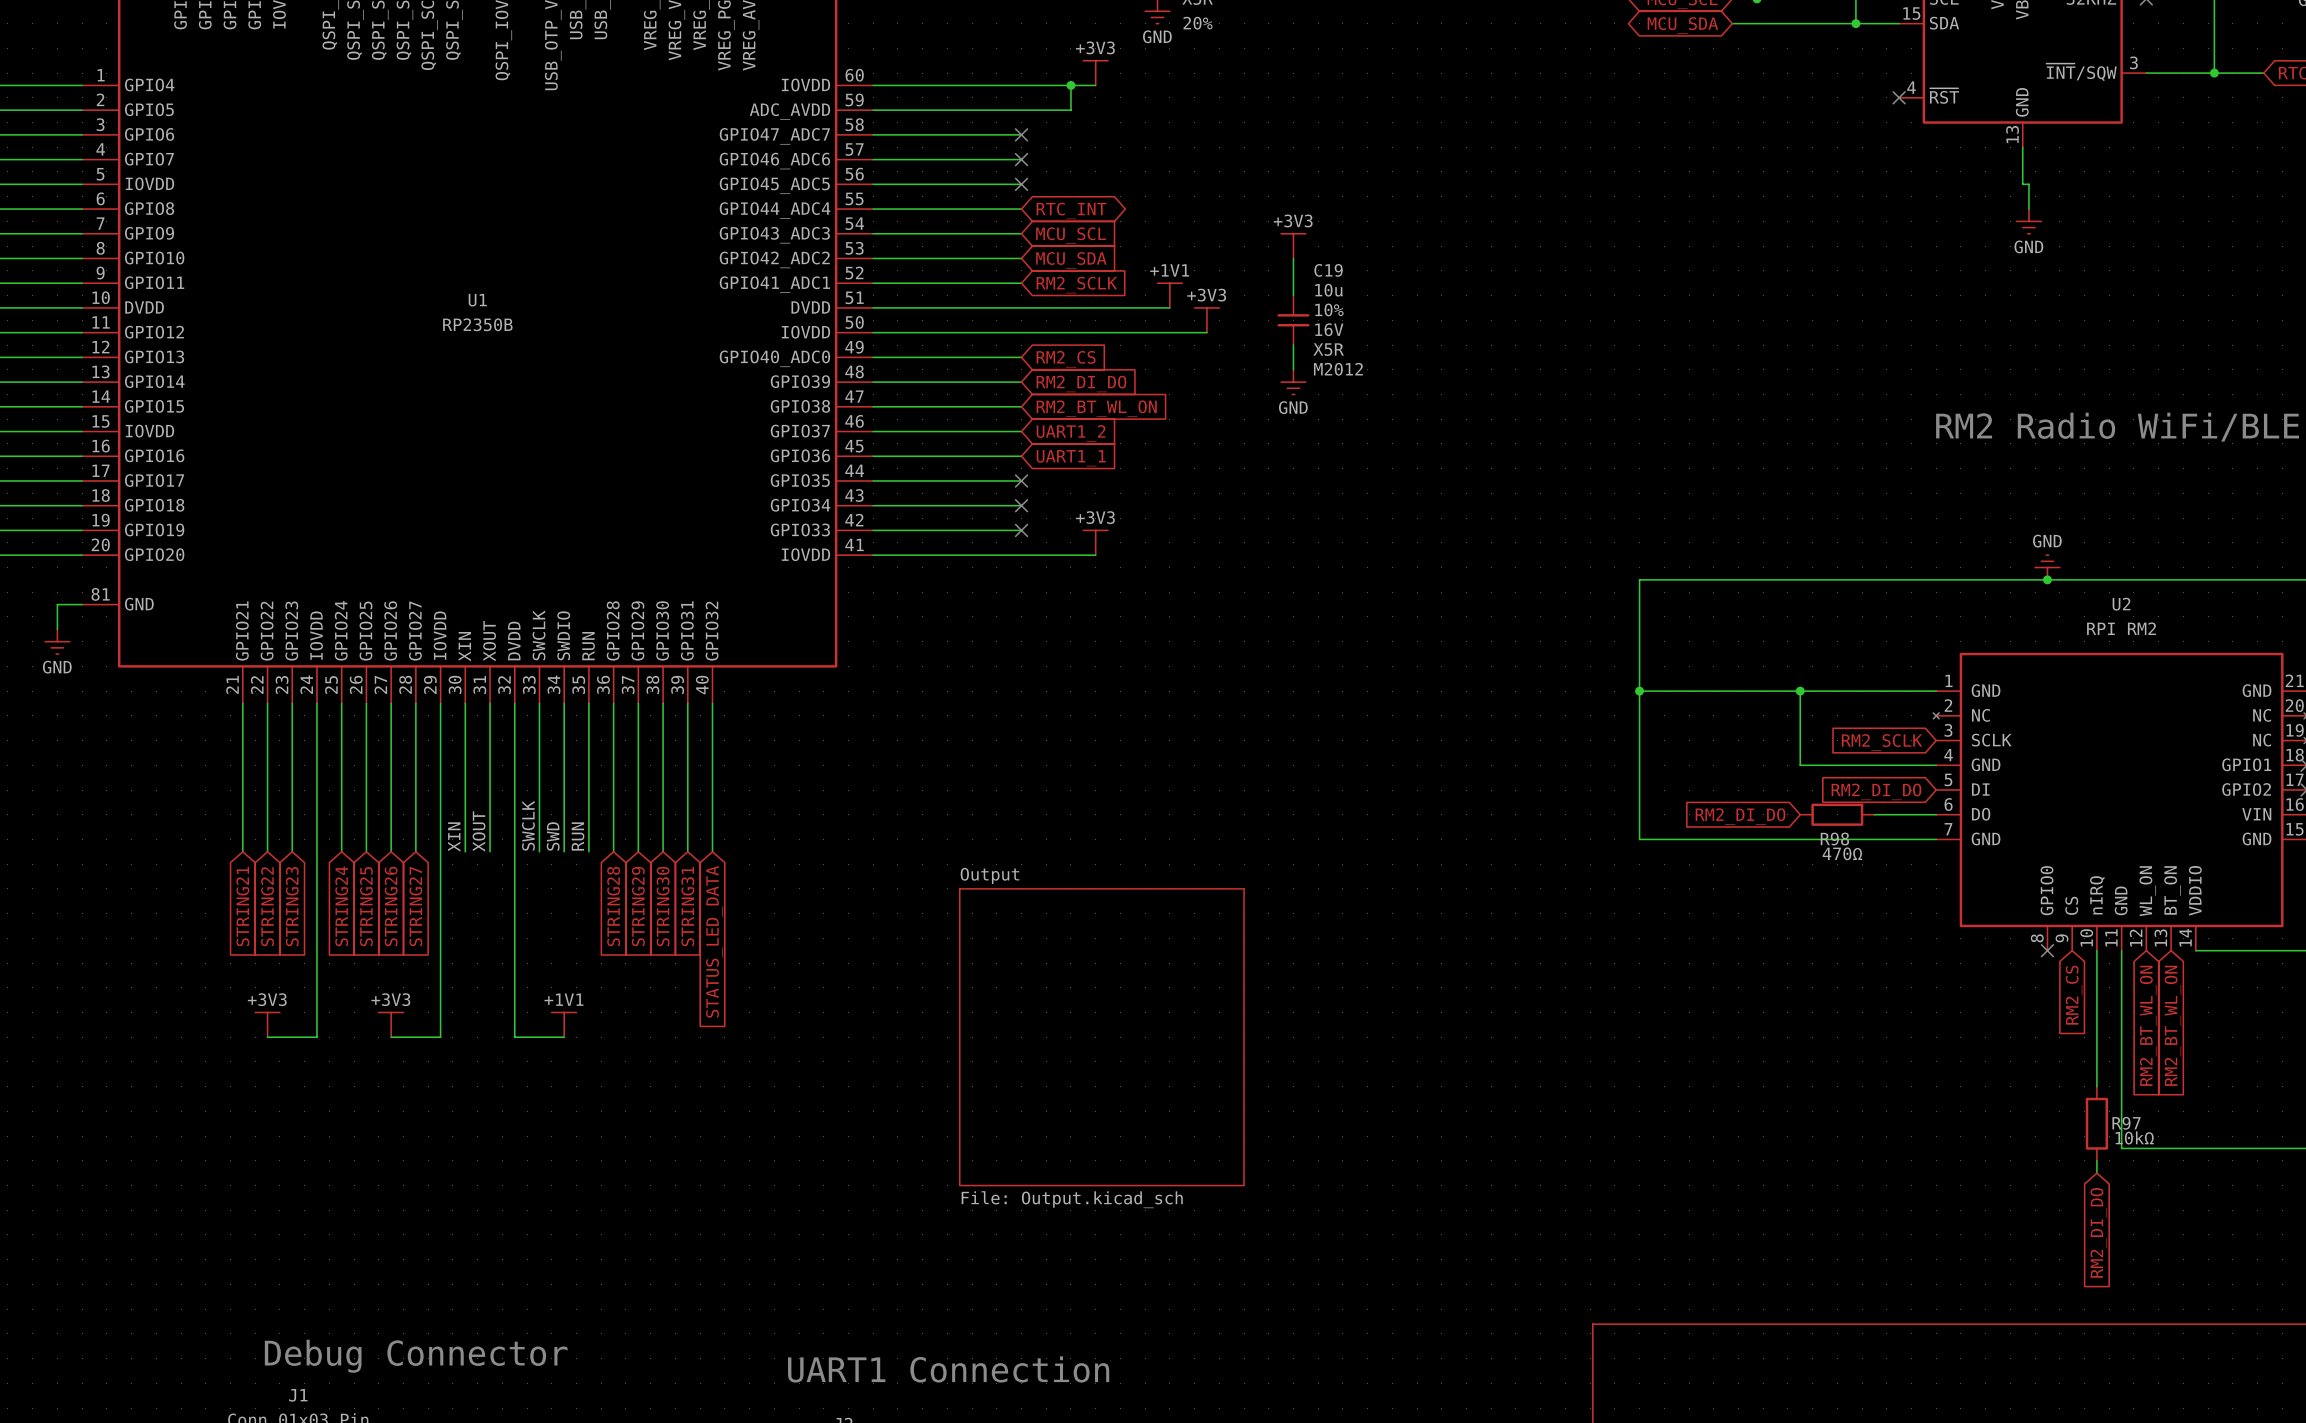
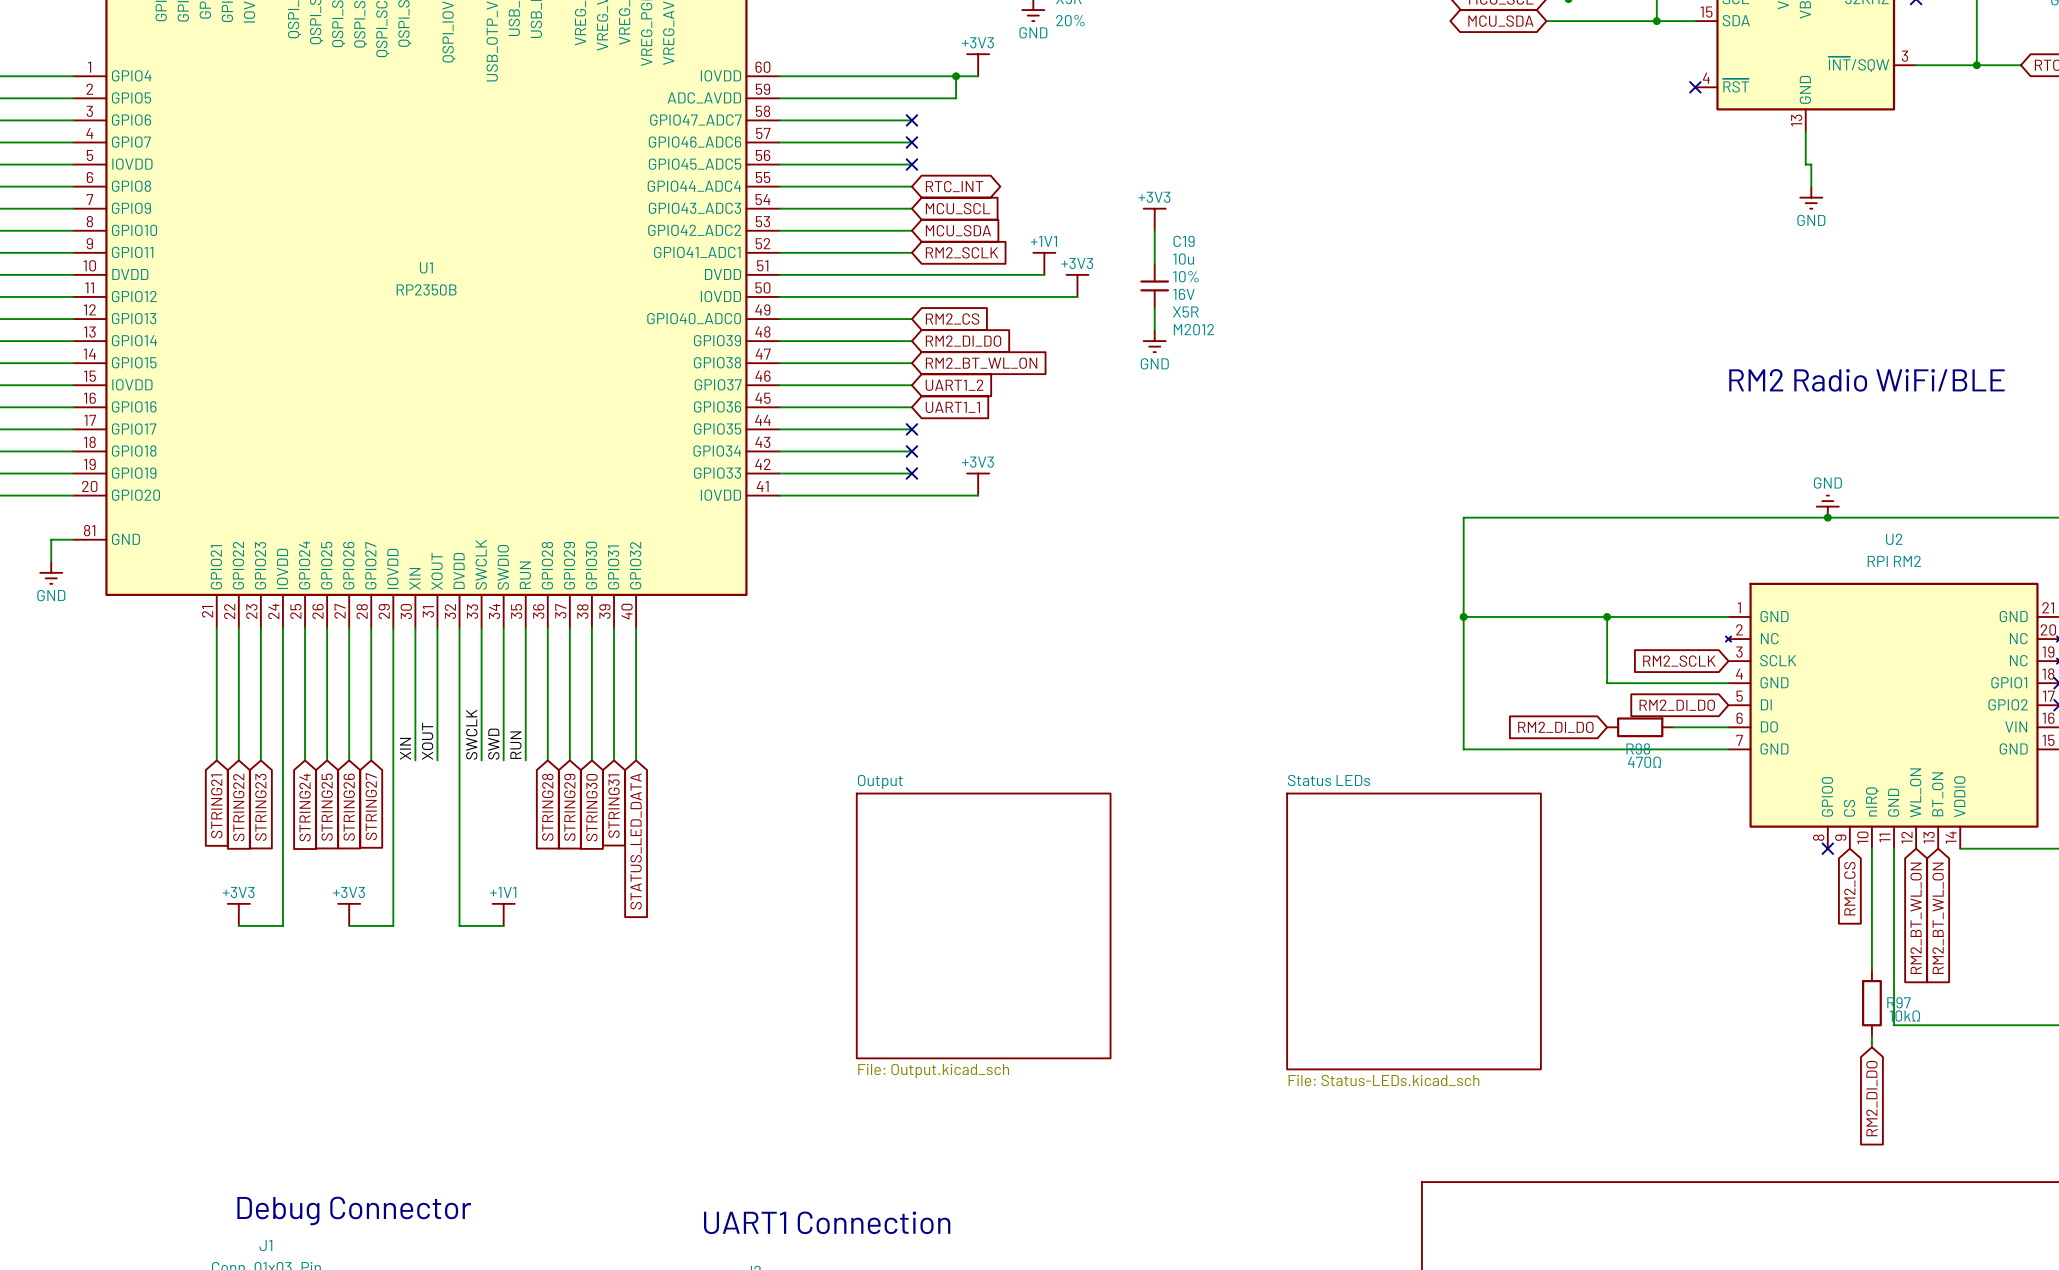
sheet Status LEDs: none -> File: Status-LEDs.kicad_sch (1414, 931)

